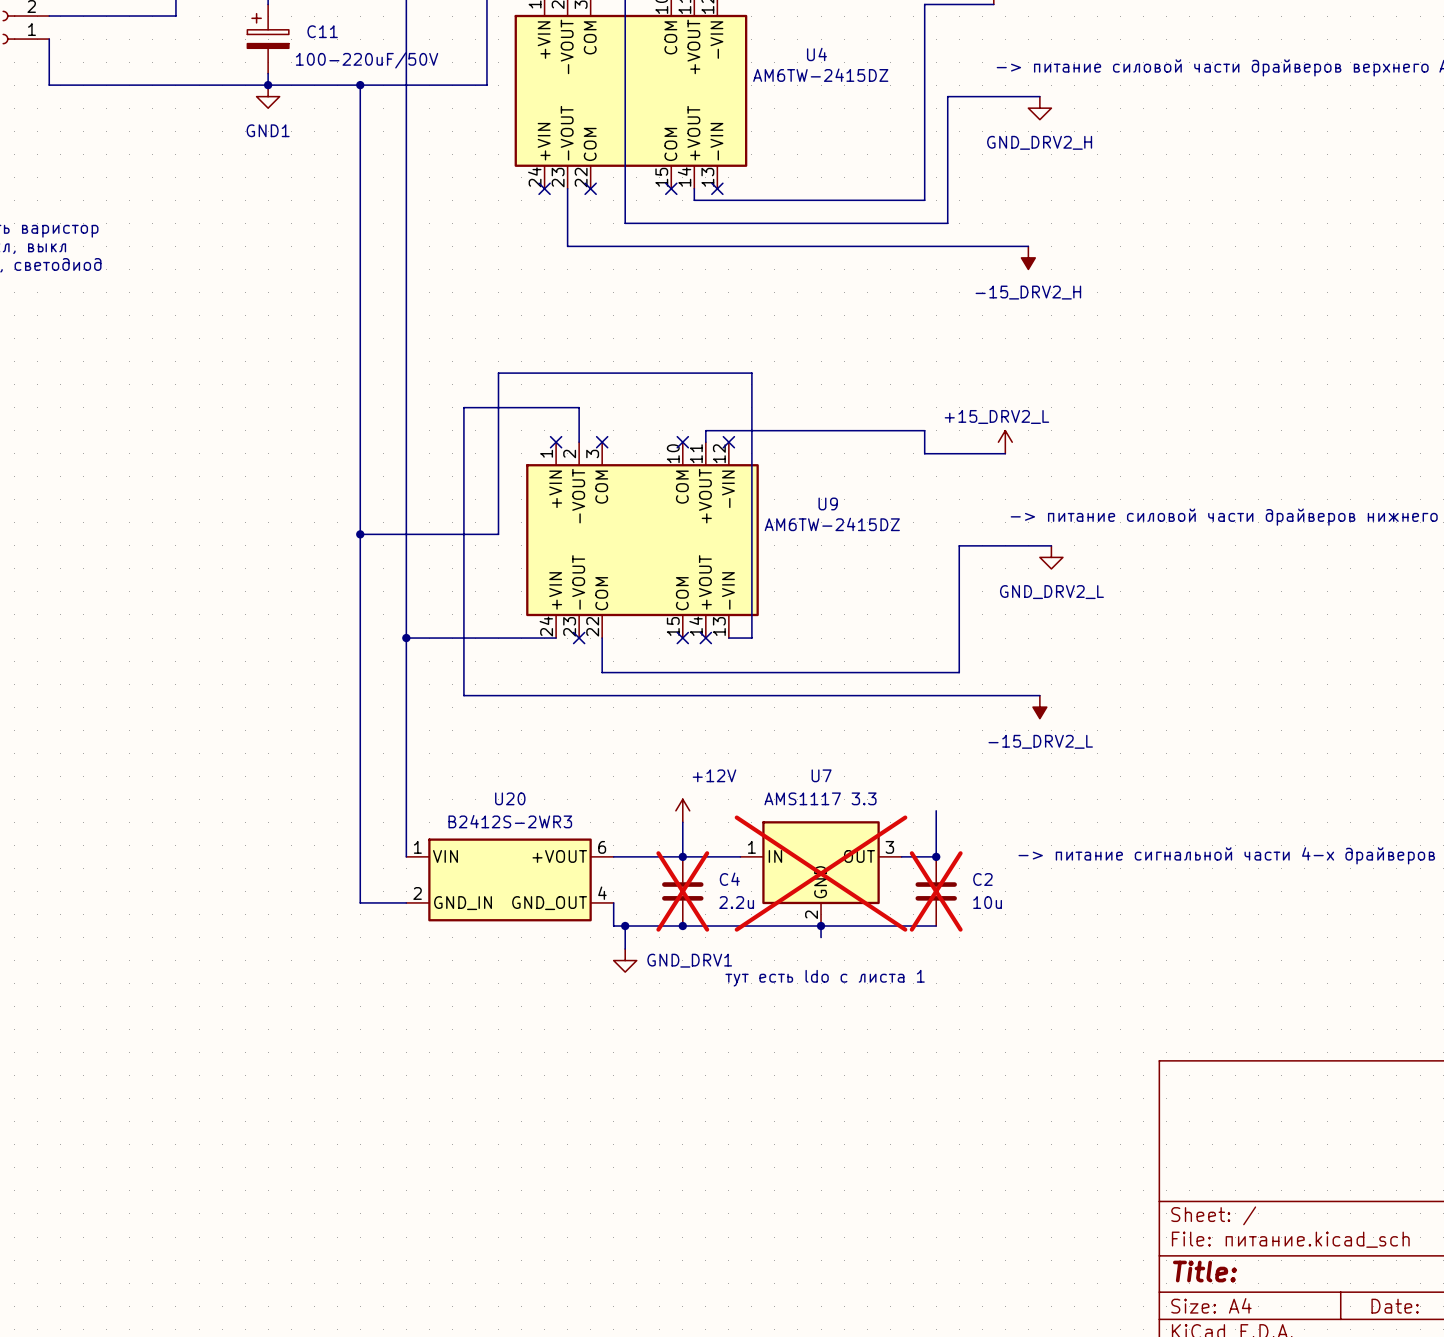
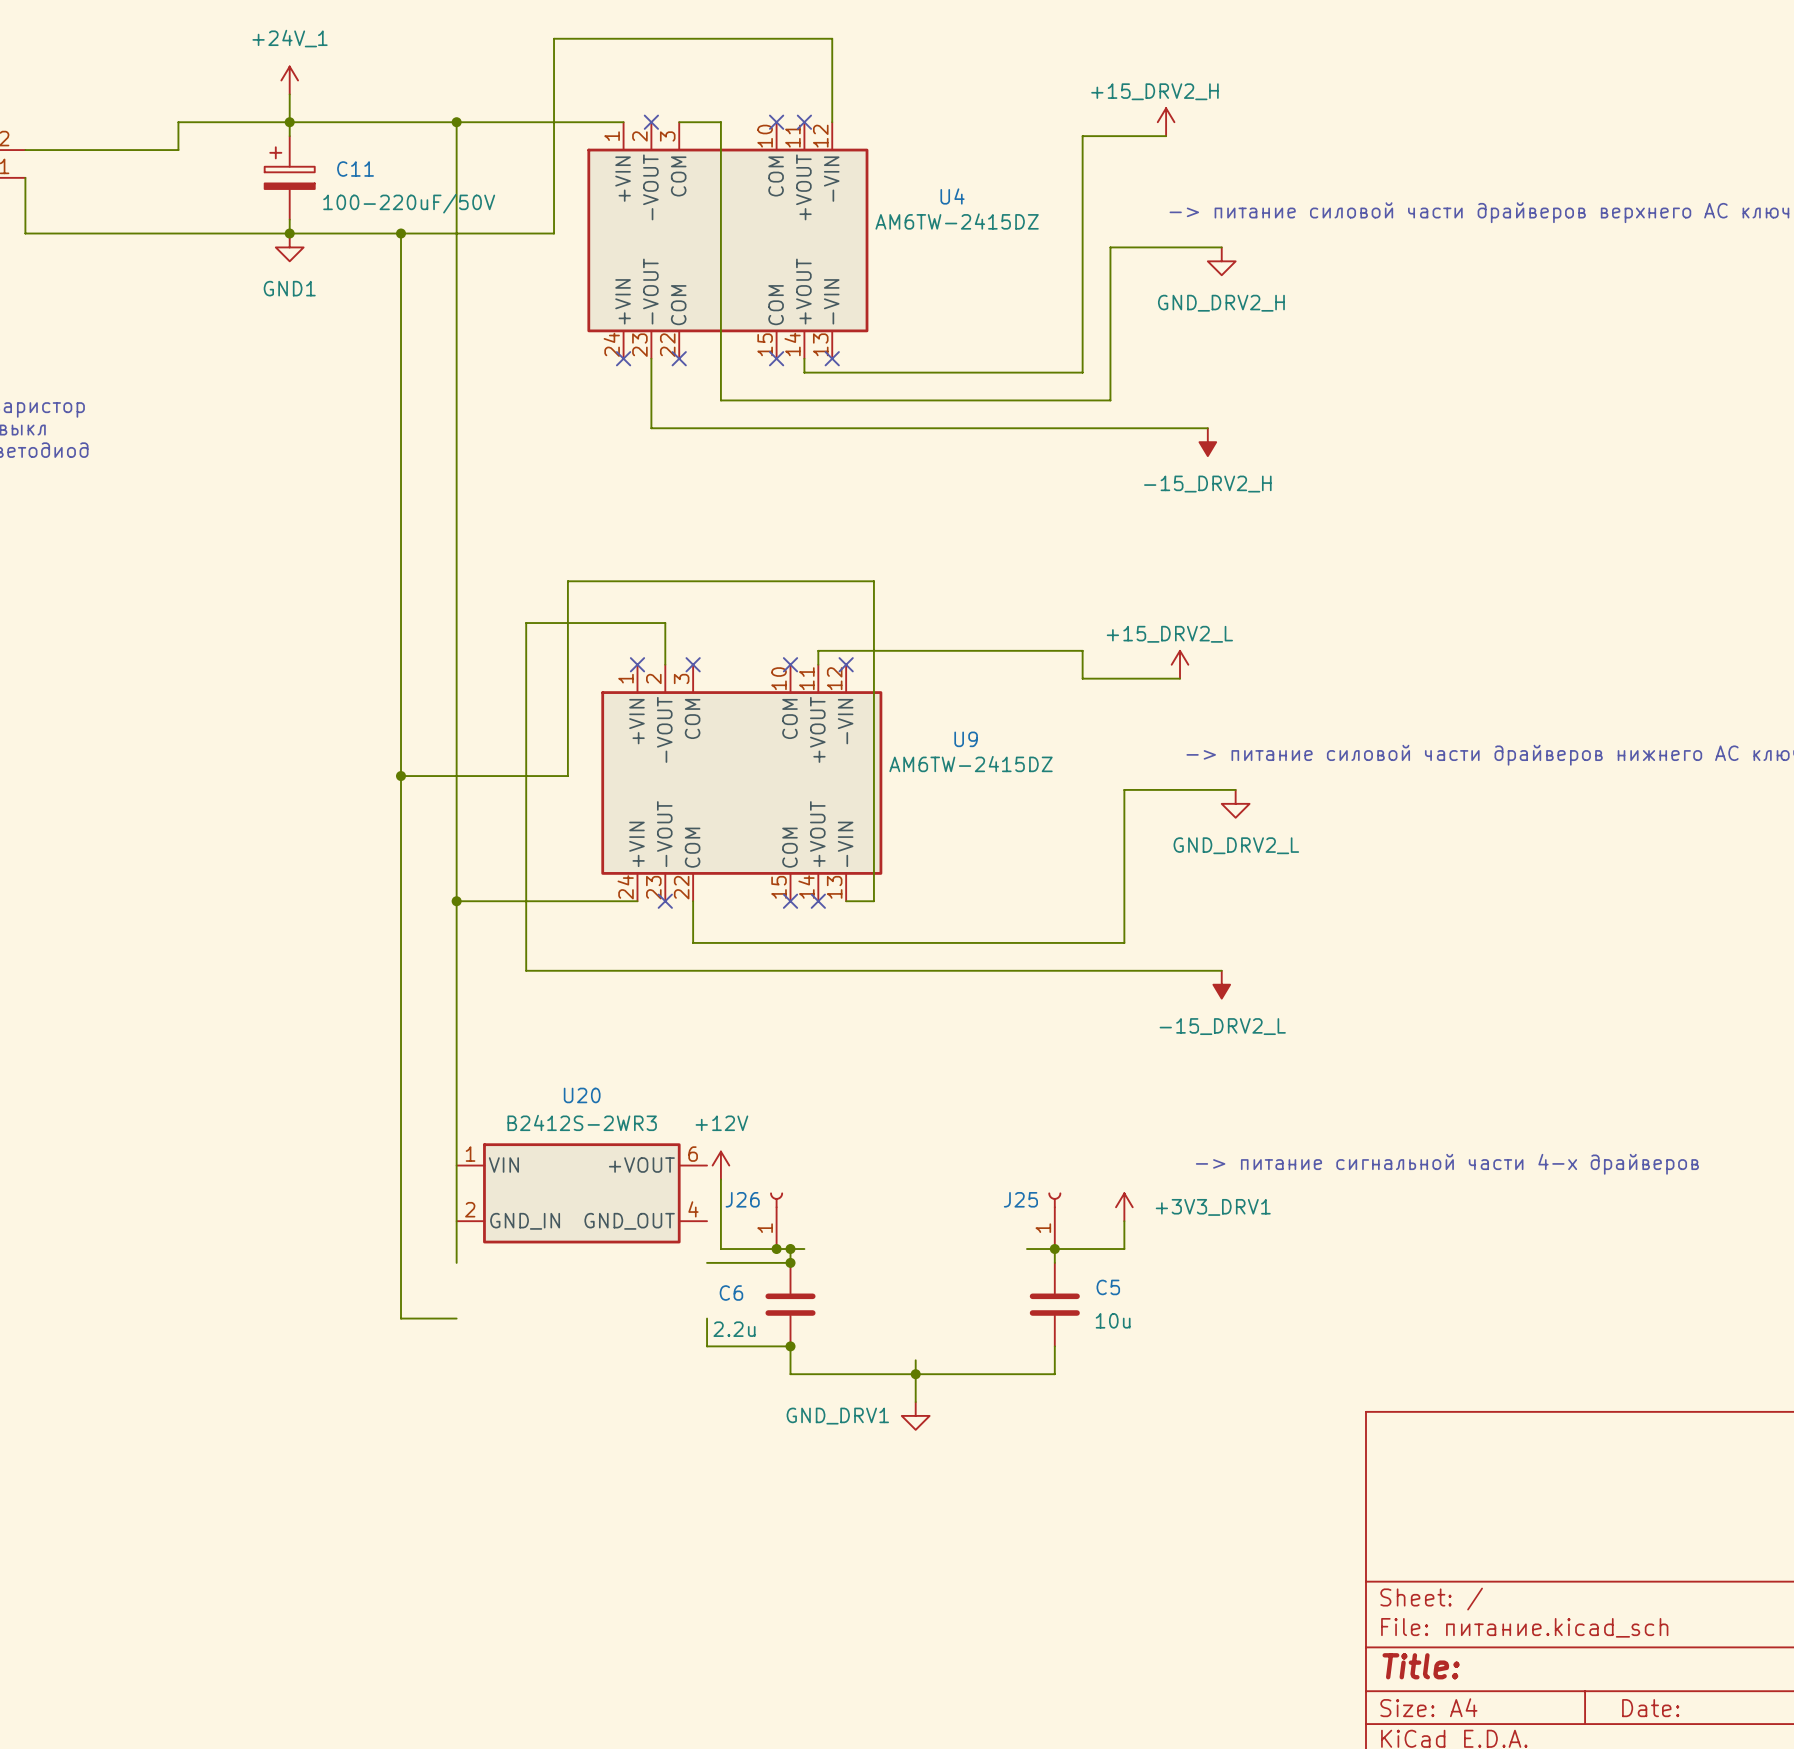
power symbol text position: +12V (714, 775) -> +12V (721, 1123)
power symbol position: +12V (682, 810) -> +12V (720, 1165)
wire: (936, 810) (936, 856) (901, 856) -> none
wire: (682, 822) (682, 856) -> (915, 1360) (915, 1402)
wire: none -> (456, 1165) (456, 1262)
wire: (613, 856) (740, 856) -> none
junction: (682, 856) -> none
junction: (936, 856) -> none
wire: none -> (720, 1179) (720, 1249)
U7: AMS1117 3.3 (821, 873) -> none
C4: 2.2u (682, 891) -> none
C2: 10u (936, 891) -> none
power symbol: none -> +3V3_DRV1 (1124, 1207)
wire: (360, 902) (406, 902) -> (401, 1221) (401, 1318) (456, 1318)
wire: (613, 902) (613, 926) (625, 926) (625, 949) -> none
J26: none -> (776, 1220)
J25: none -> (1054, 1220)
wire: none -> (1124, 1221) (1124, 1249) (1096, 1249)
junction: (625, 926) -> none
junction: none -> (776, 1249)
wire: none -> (790, 1249) (790, 1262) (707, 1262)
wire: (694, 926) (878, 926) -> none
wire: (821, 926) (821, 937) -> (1054, 1249) (1054, 1262)
junction: (821, 926) -> none
junction: none -> (1054, 1249)
junction: none -> (790, 1262)
power symbol position: GND_DRV1 (625, 960) -> GND_DRV1 (915, 1415)
power symbol text position: GND_DRV1 (689, 960) -> GND_DRV1 (837, 1416)
C6: none -> 2.2u (790, 1304)
C5: none -> 10u (1054, 1304)
text: тут есть ldo с листа 1 (825, 978) -> none
wire: none -> (707, 1318) (707, 1346) (790, 1346) (790, 1374) (1054, 1374) (1054, 1346)
junction: none -> (790, 1346)
junction: none -> (915, 1374)

